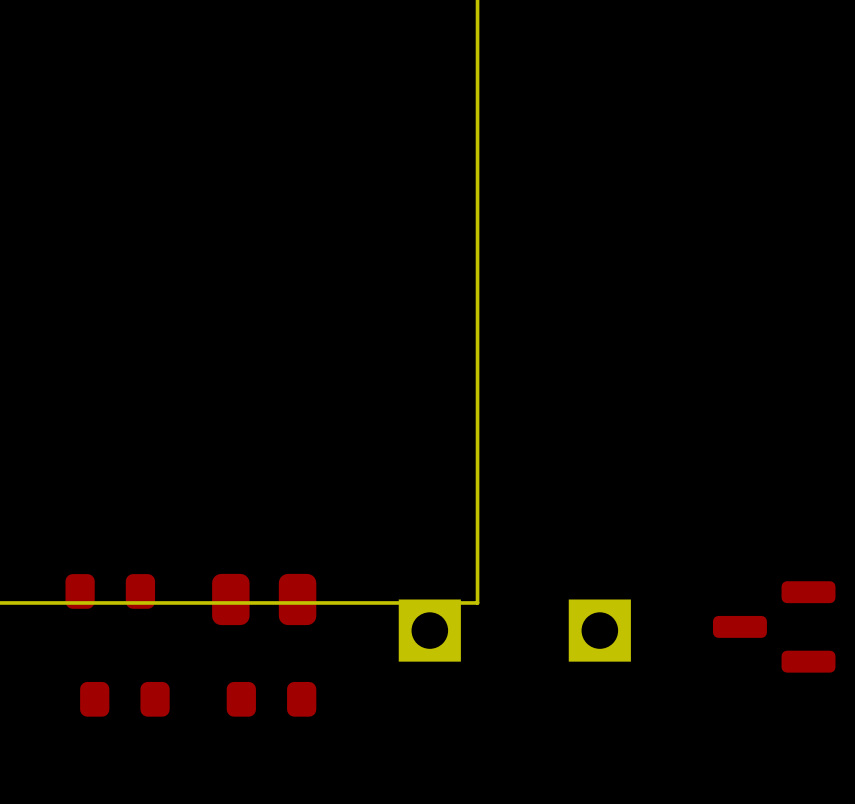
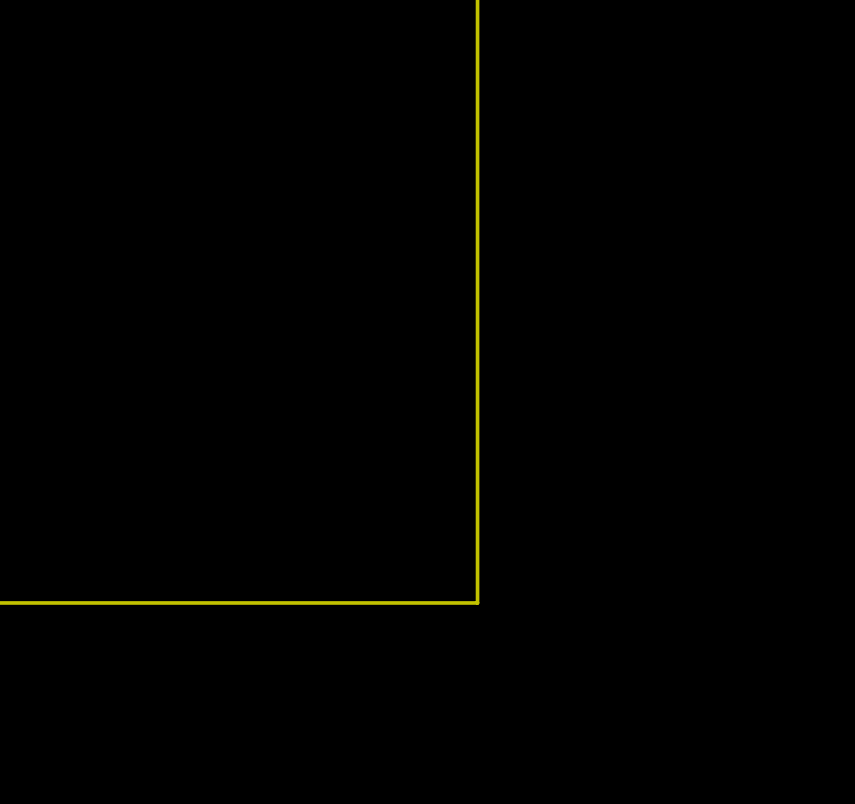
part: (110, 591) -> none
part: (264, 599) -> none
part: (774, 626) -> none
part: (429, 630) -> none
part: (599, 630) -> none
part: (124, 699) -> none
part: (271, 699) -> none

